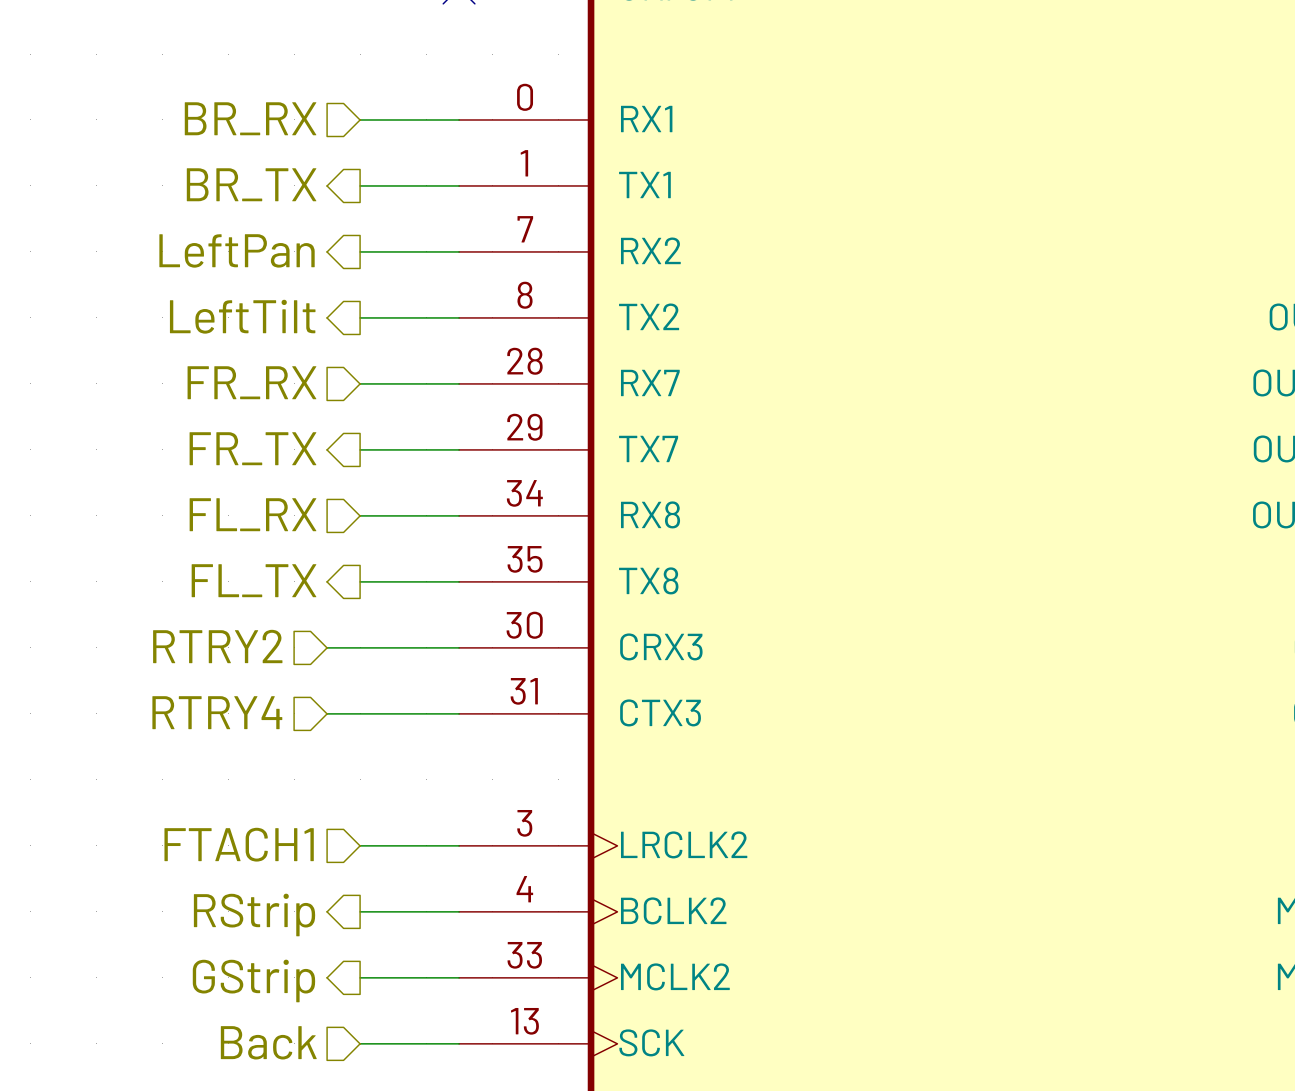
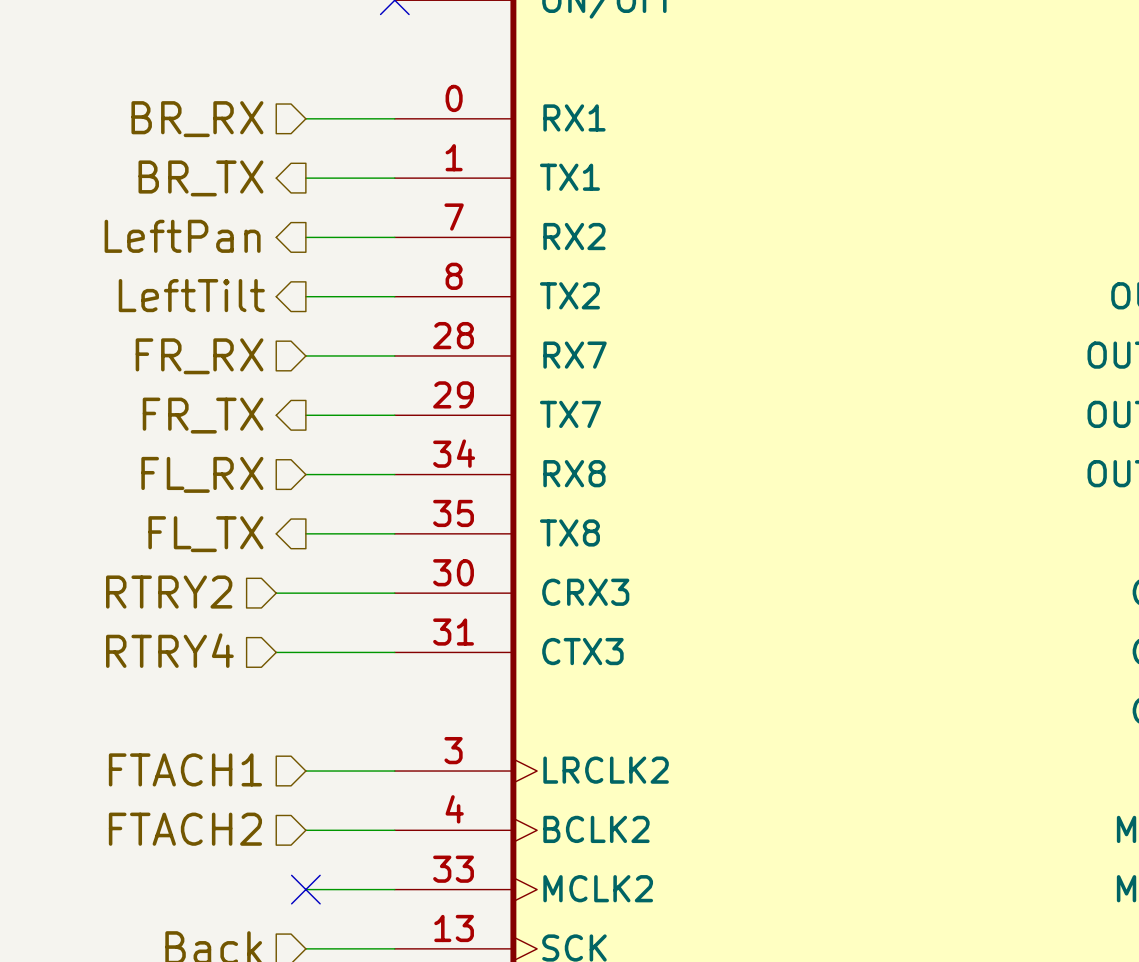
hierarchical label shape: output (254, 914) -> input (185, 829)
hierarchical label: RStrip (254, 914) -> FTACH2 (185, 829)
no-connect mark: none -> (305, 889)
hierarchical label: GStrip (253, 980) -> none

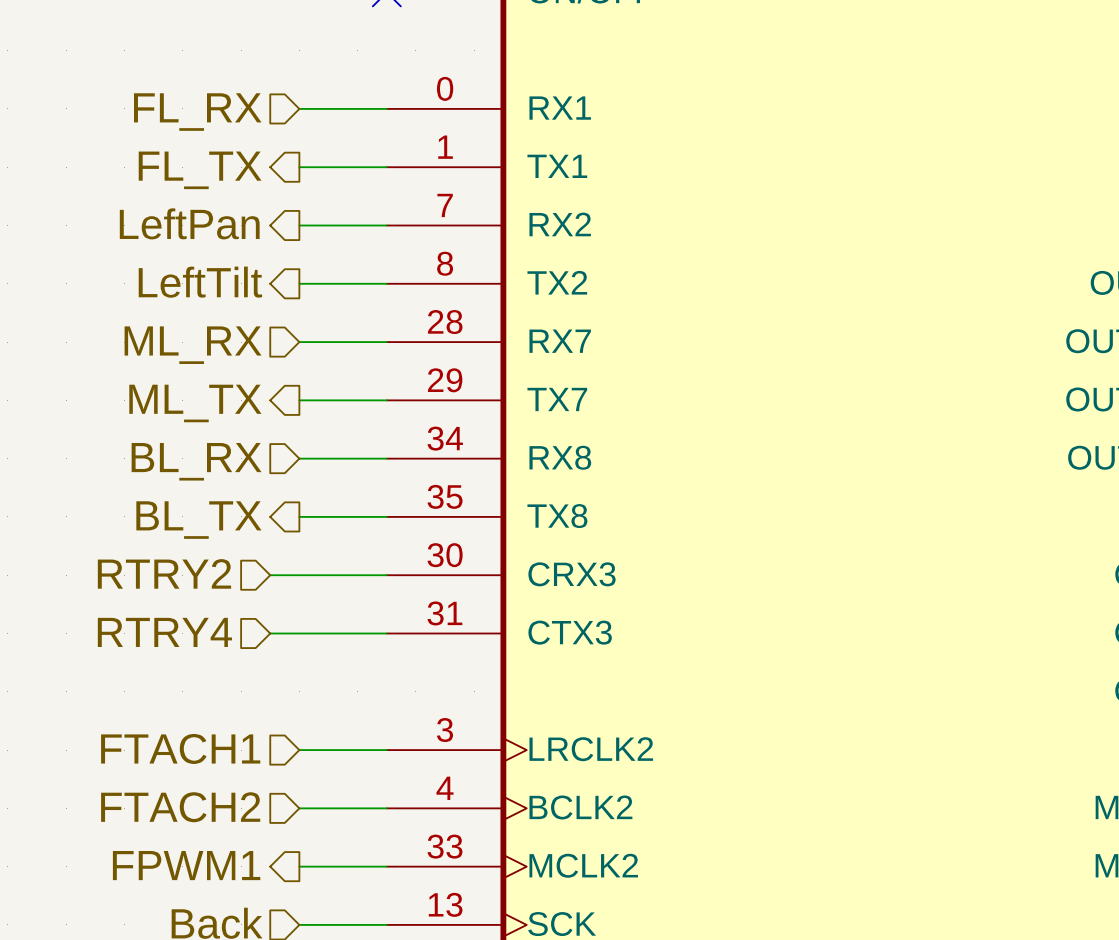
hierarchical label: BR_RX (197, 119) -> FL_RX (197, 112)
hierarchical label: BR_TX (200, 178) -> FL_TX (200, 170)
hierarchical label: FR_RX (199, 356) -> ML_RX (193, 345)
hierarchical label: FR_TX (203, 415) -> ML_TX (195, 403)
hierarchical label: FL_RX (202, 474) -> BL_RX (196, 461)
hierarchical label: FL_TX (205, 534) -> BL_TX (198, 520)
hierarchical label: none -> FPWM1 (186, 865)
no-connect mark: (305, 889) -> none

